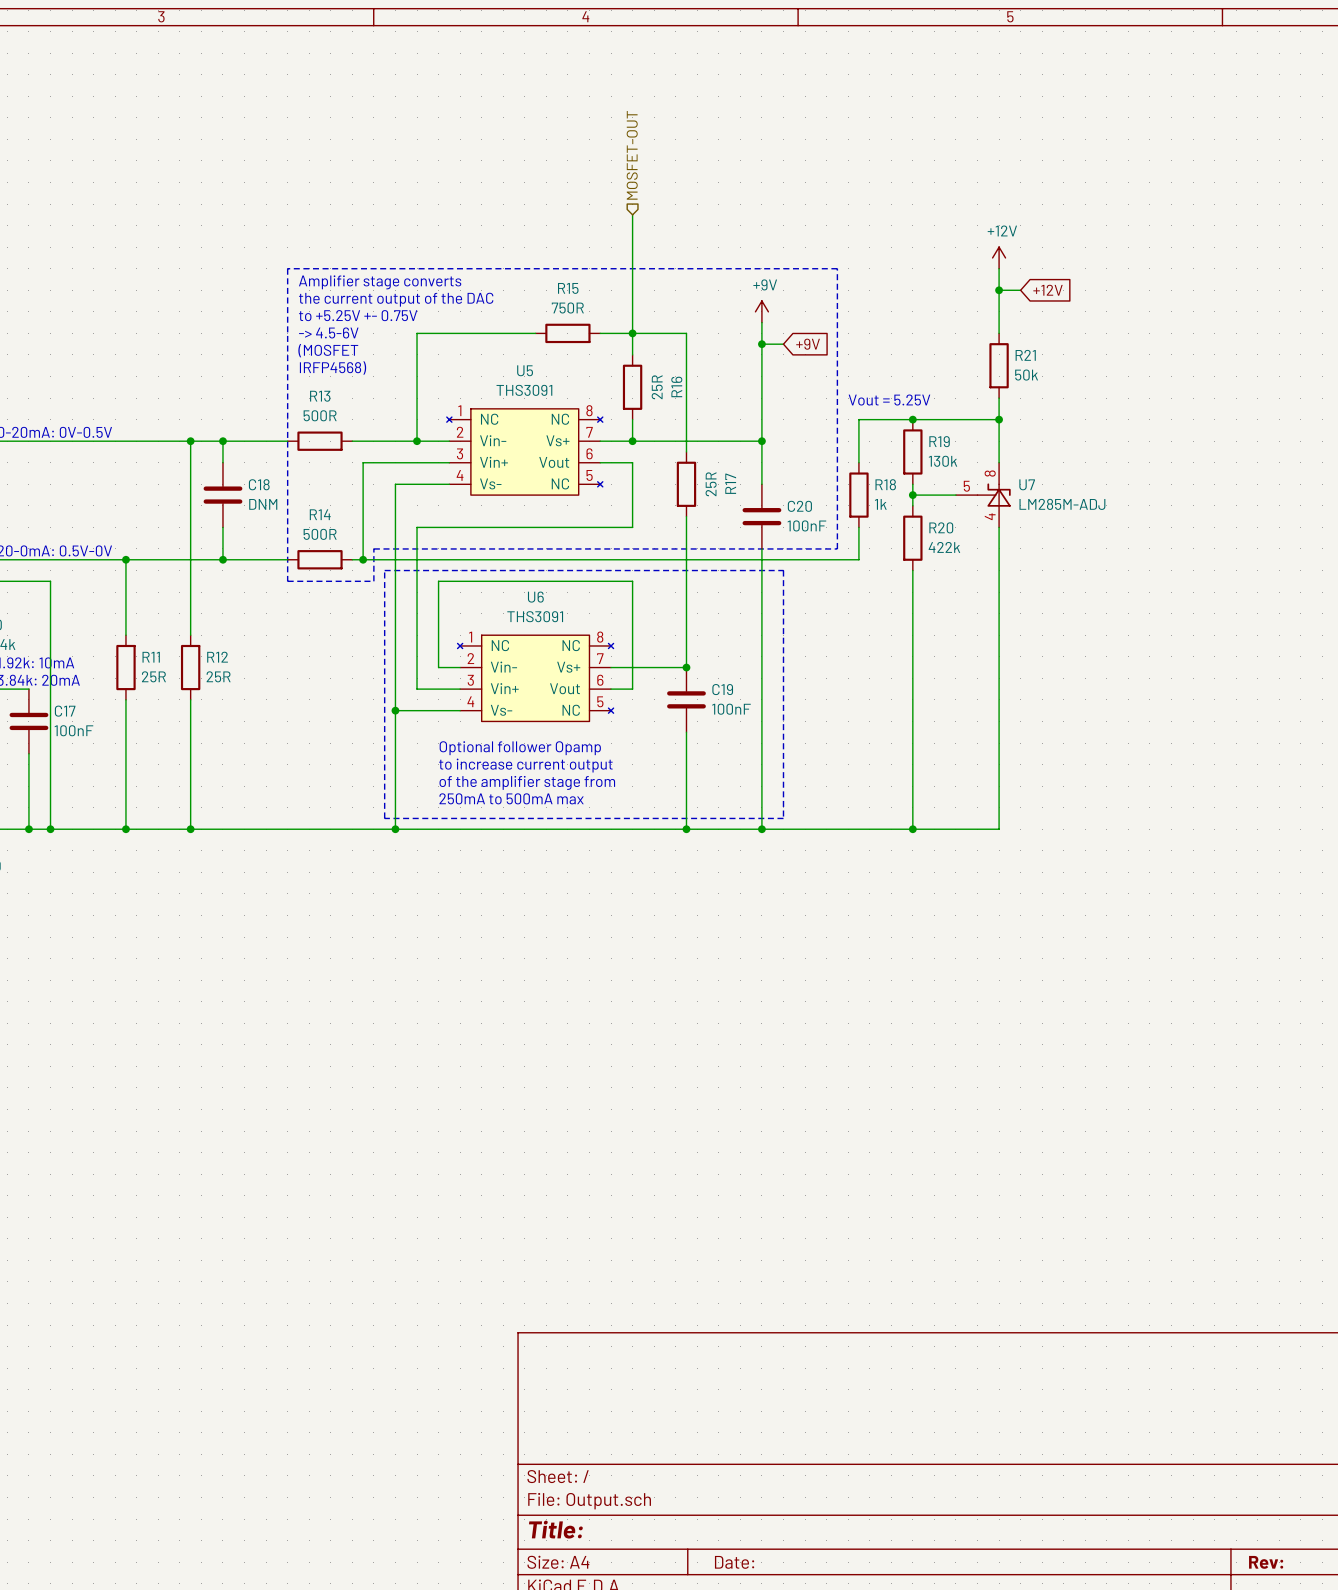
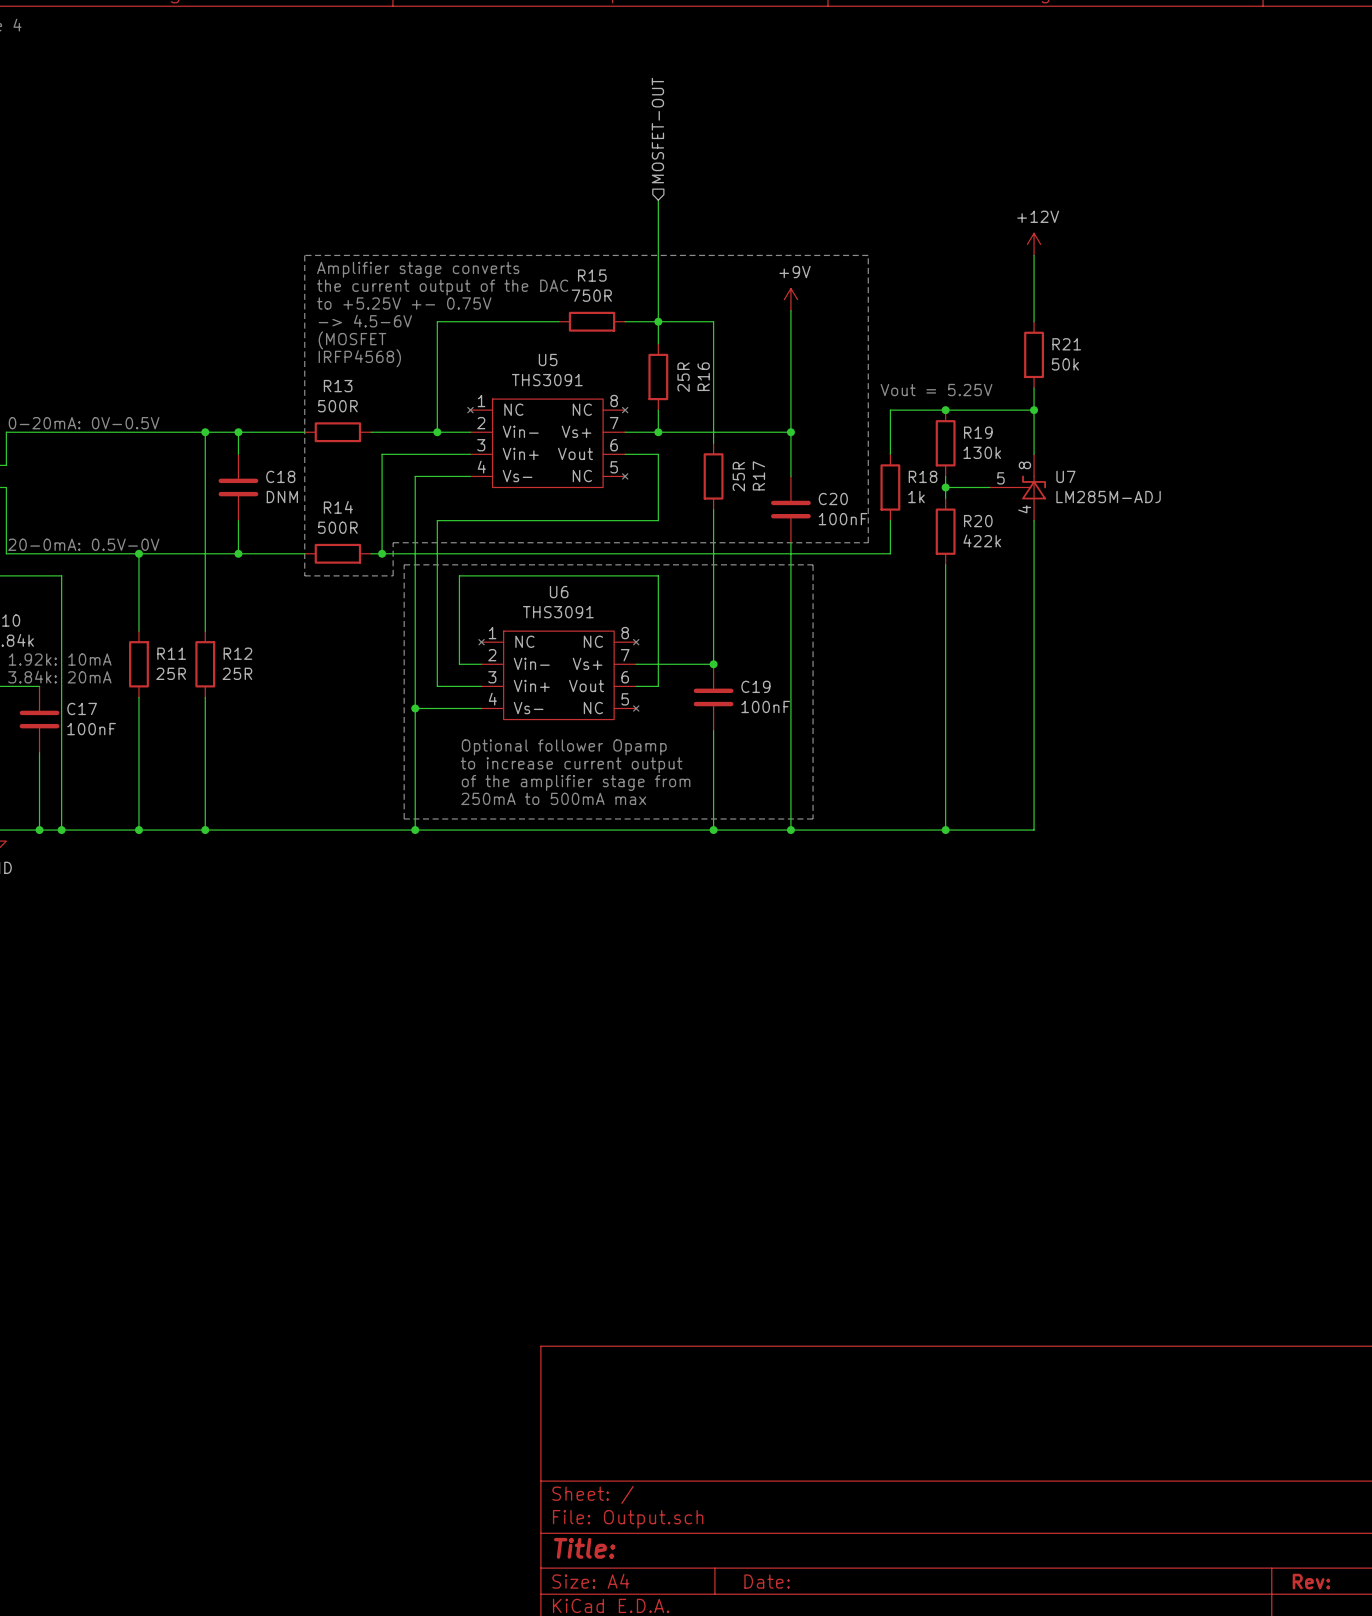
wire: (999, 290) (1020, 290) -> none
junction: (999, 290) -> none
global label: +12V (1048, 290) -> none
wire: (761, 344) (783, 344) -> none
junction: (761, 344) -> none
global label: +9V (808, 344) -> none

